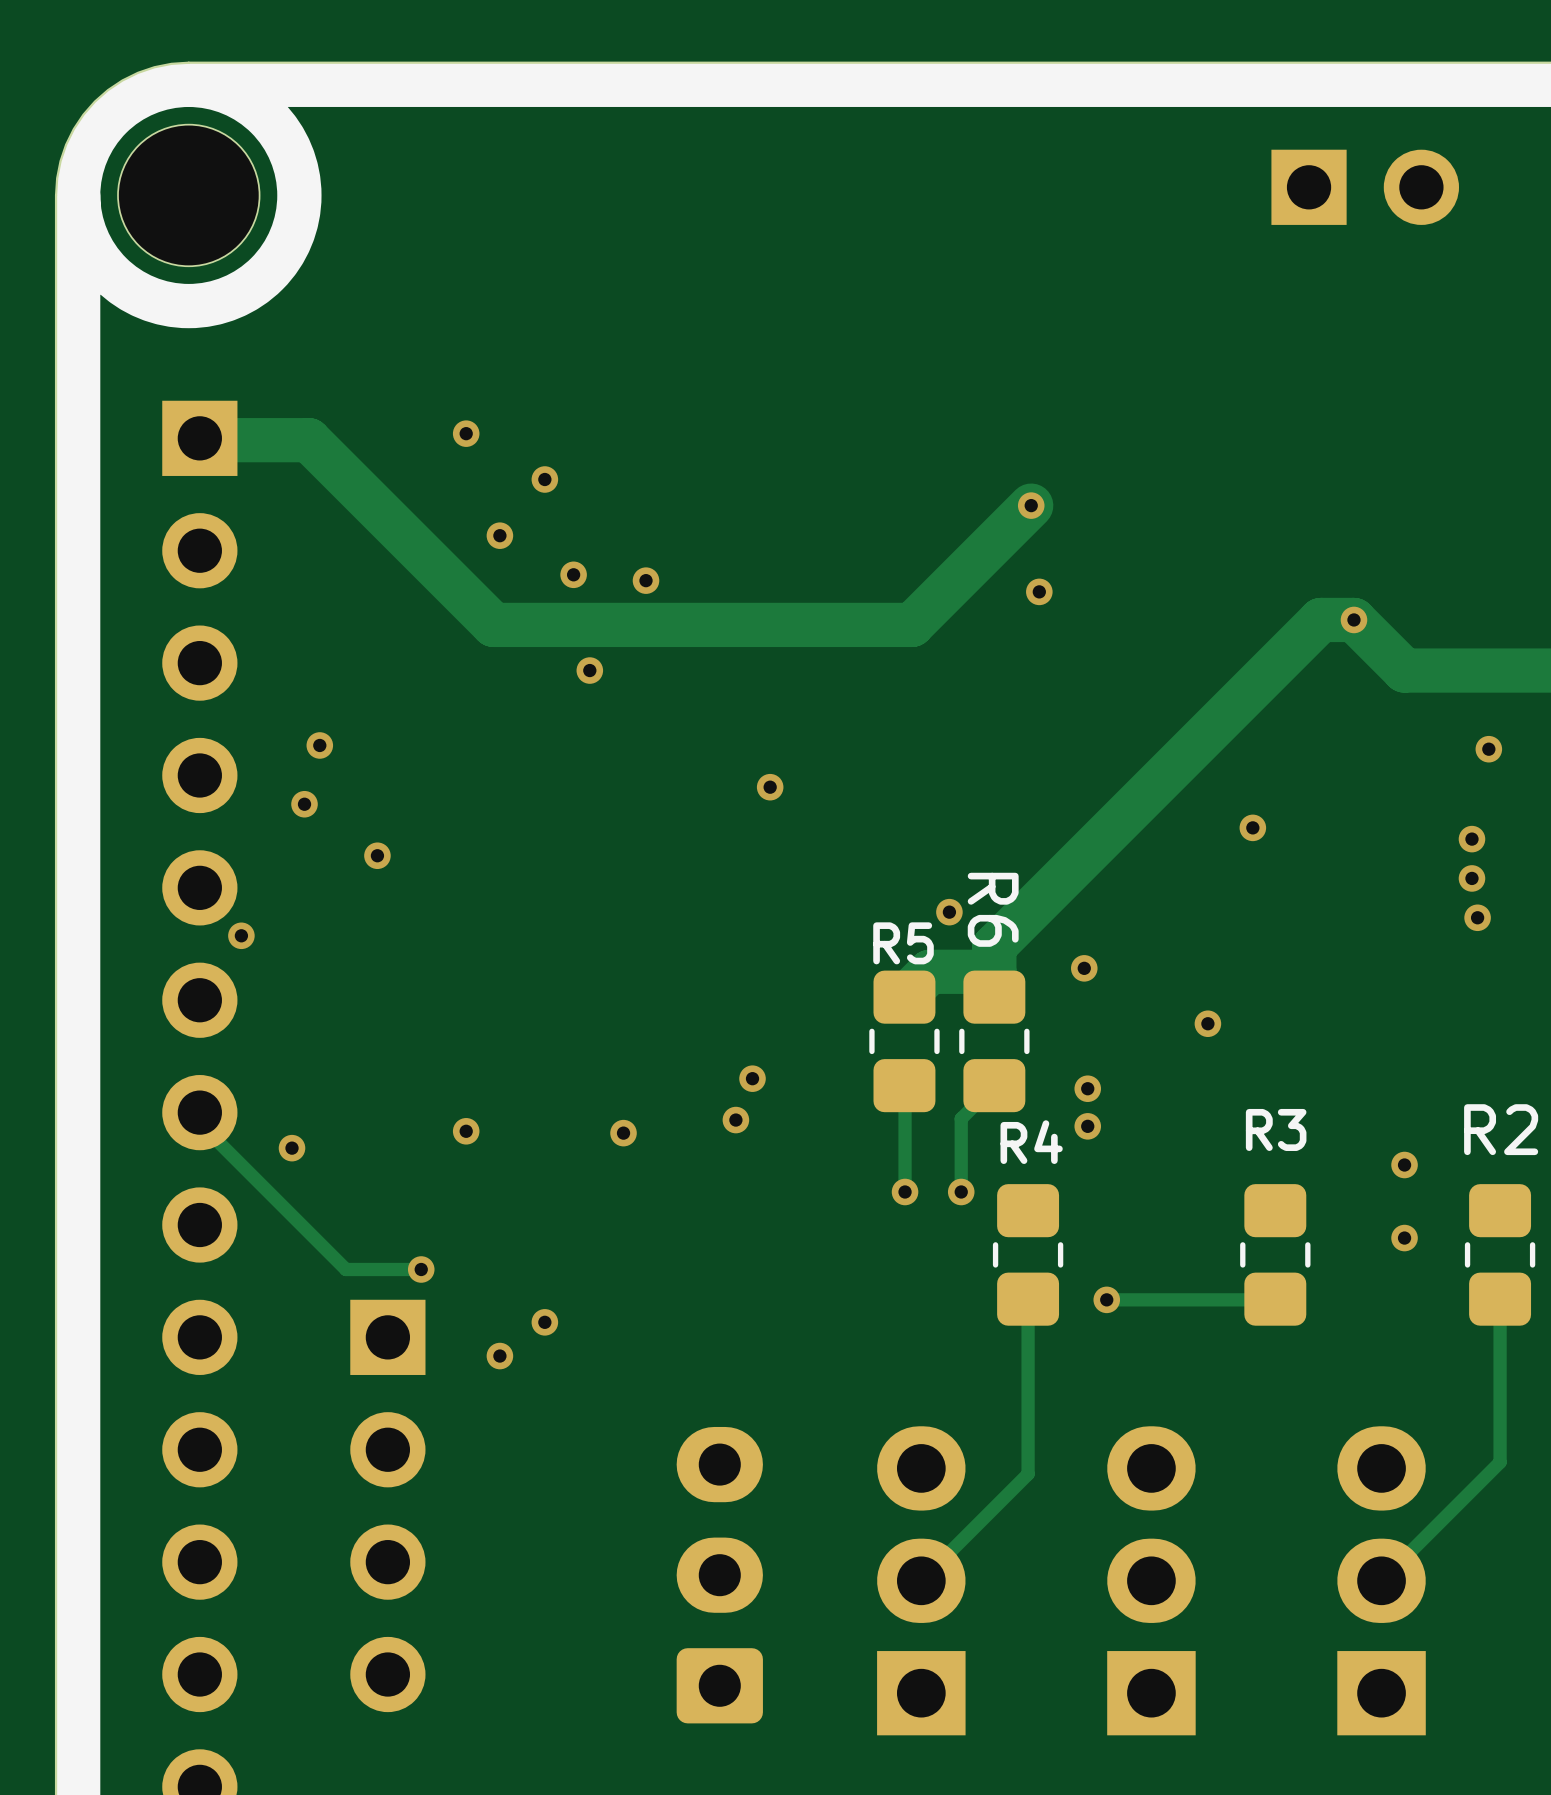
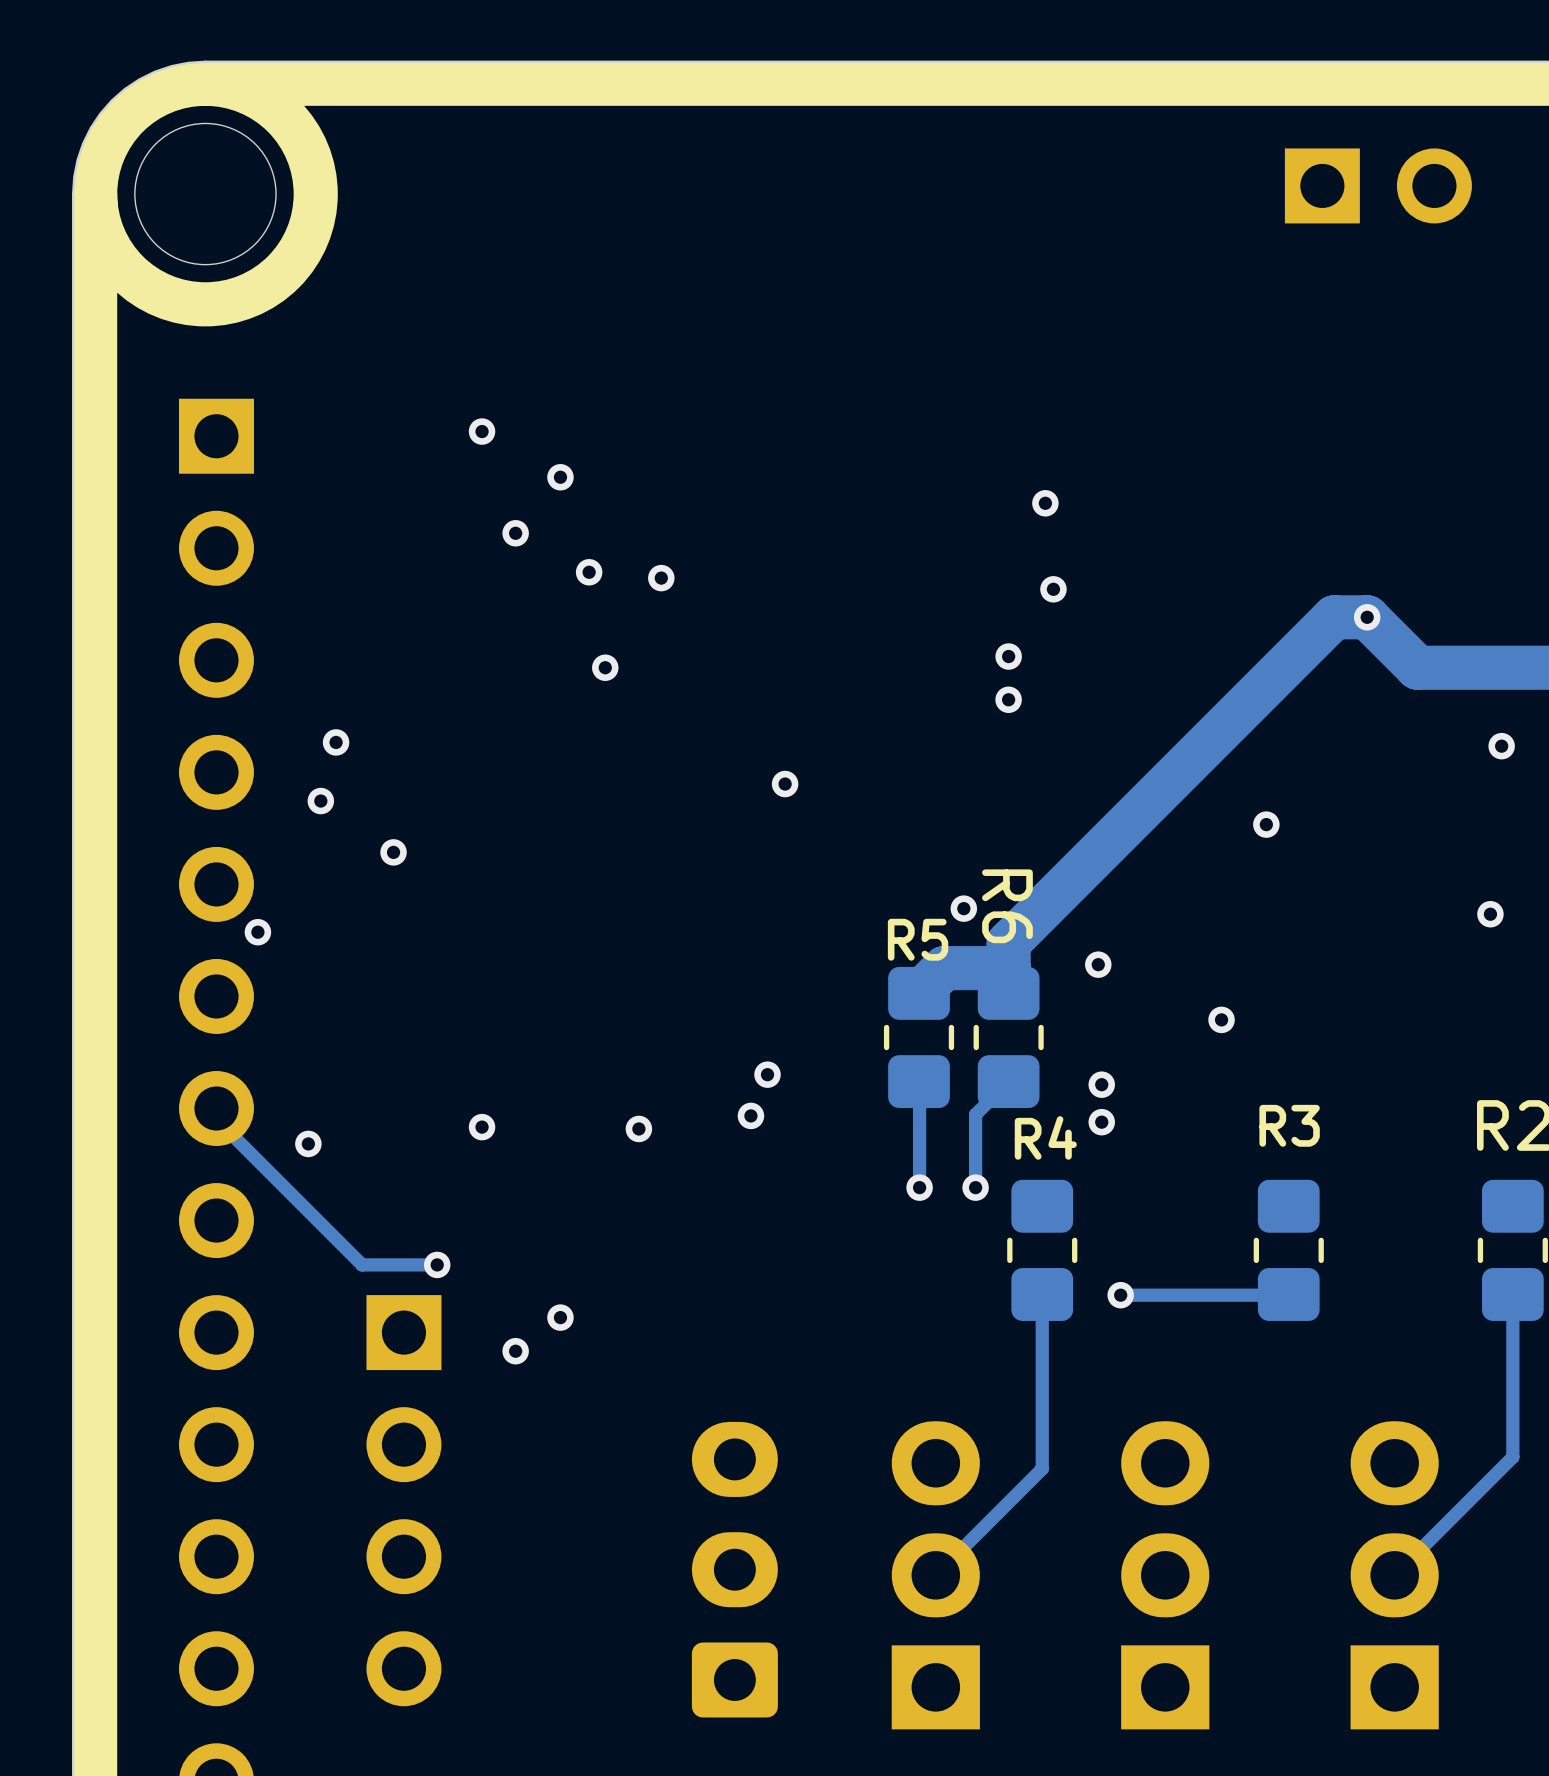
track: (199, 438) (201, 440) (308, 440) (493, 624) (911, 624) (1031, 505) -> none
via: none -> (1008, 656)
via: none -> (1008, 699)
via: (1471, 839) -> none
via: (1471, 878) -> none
via: (1404, 1165) -> none
via: (1404, 1238) -> none

